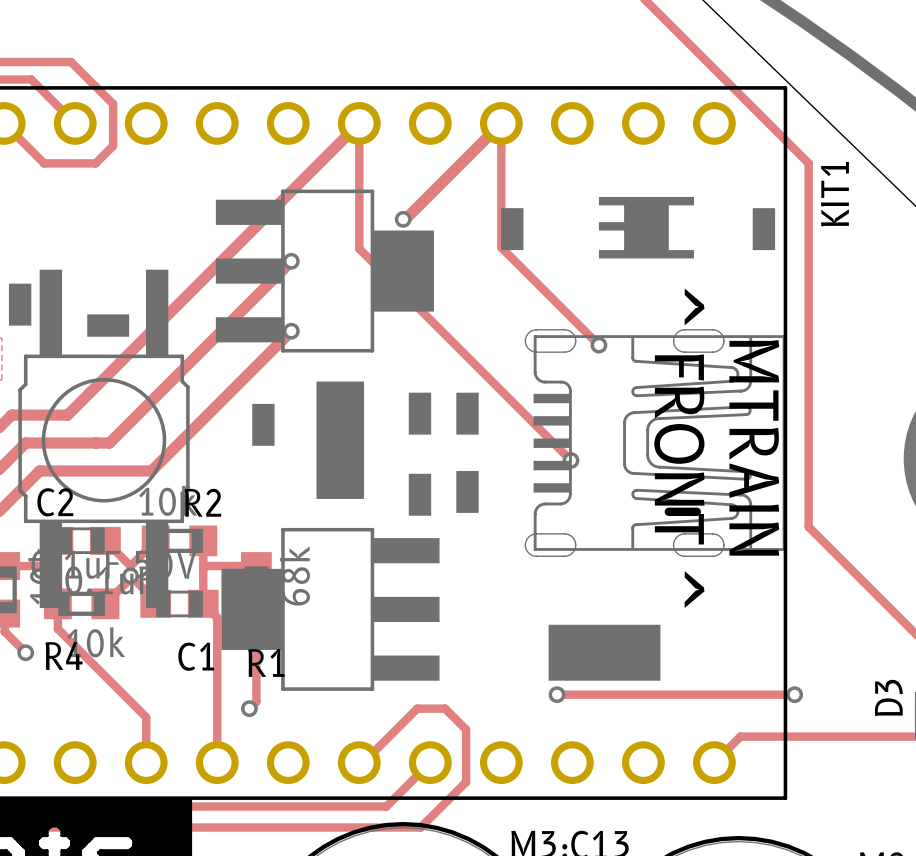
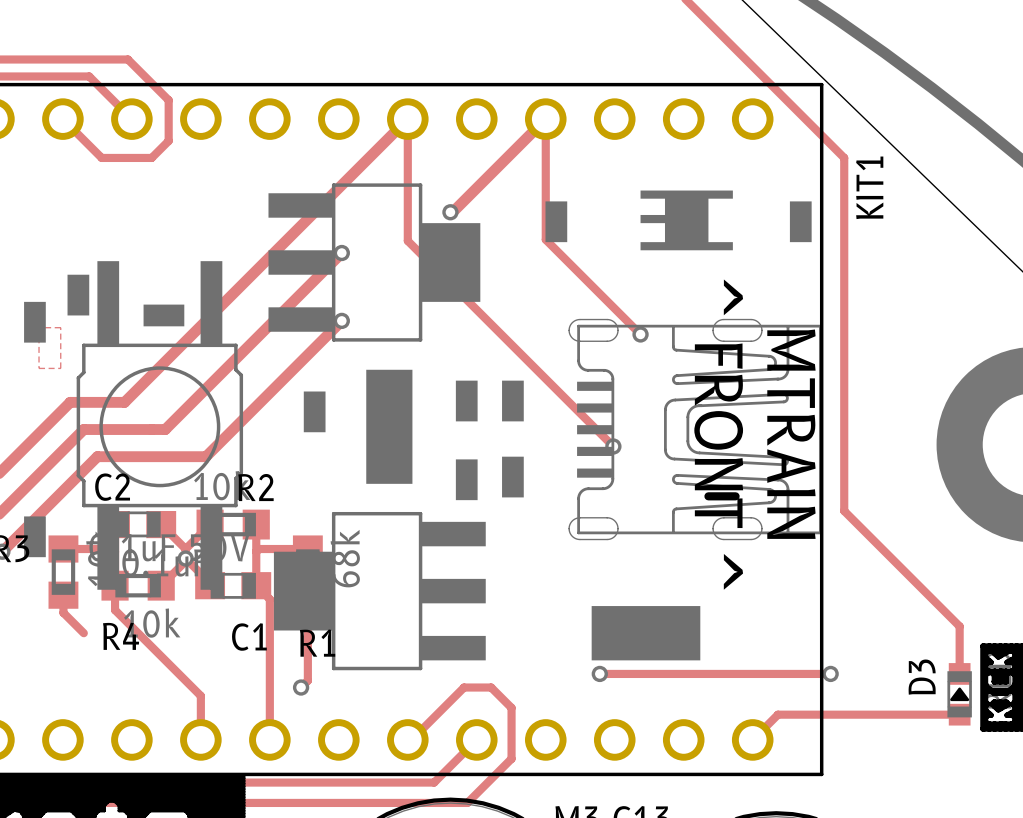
via: (25, 652) -> none

